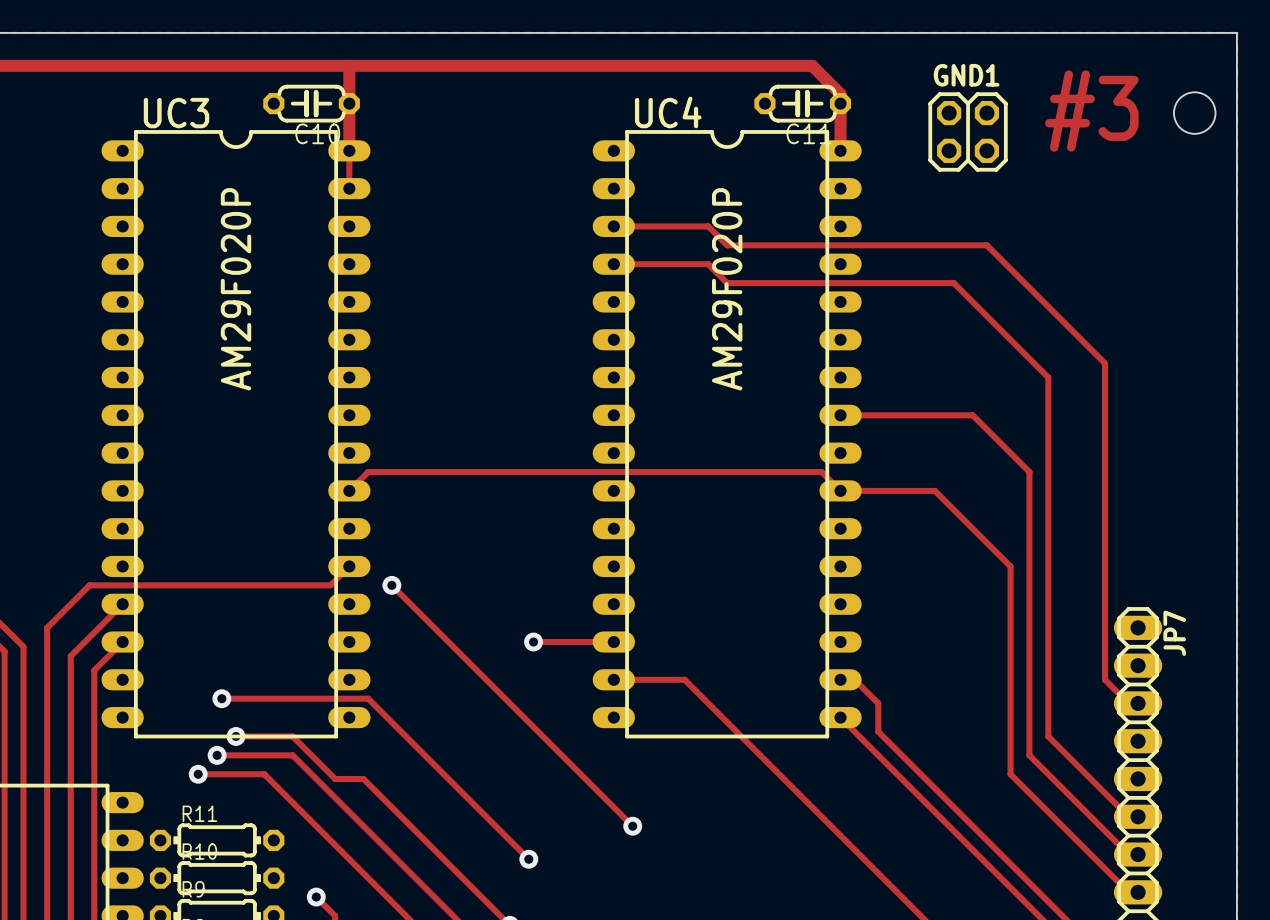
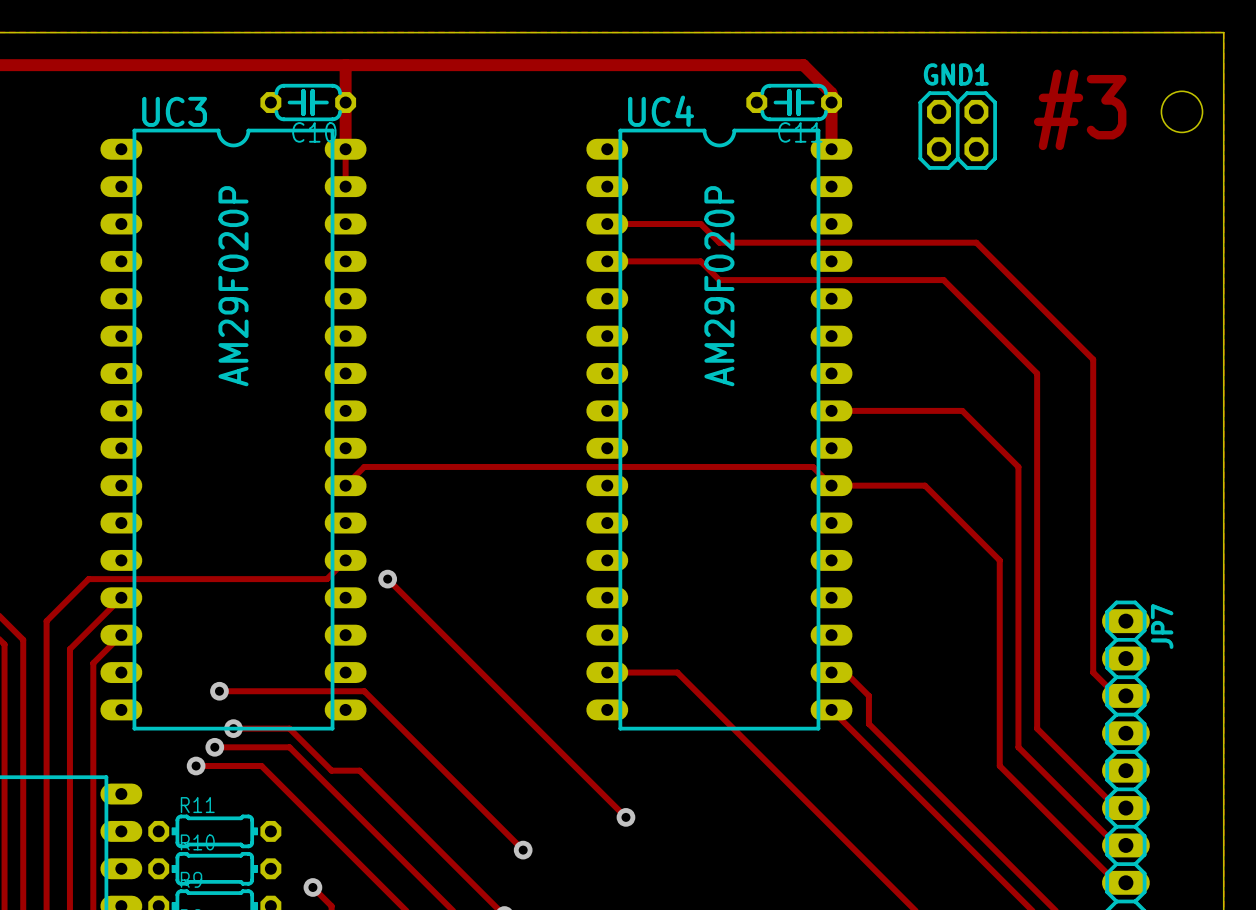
track: (533, 642) (613, 642) -> none
via: (533, 642) -> none

